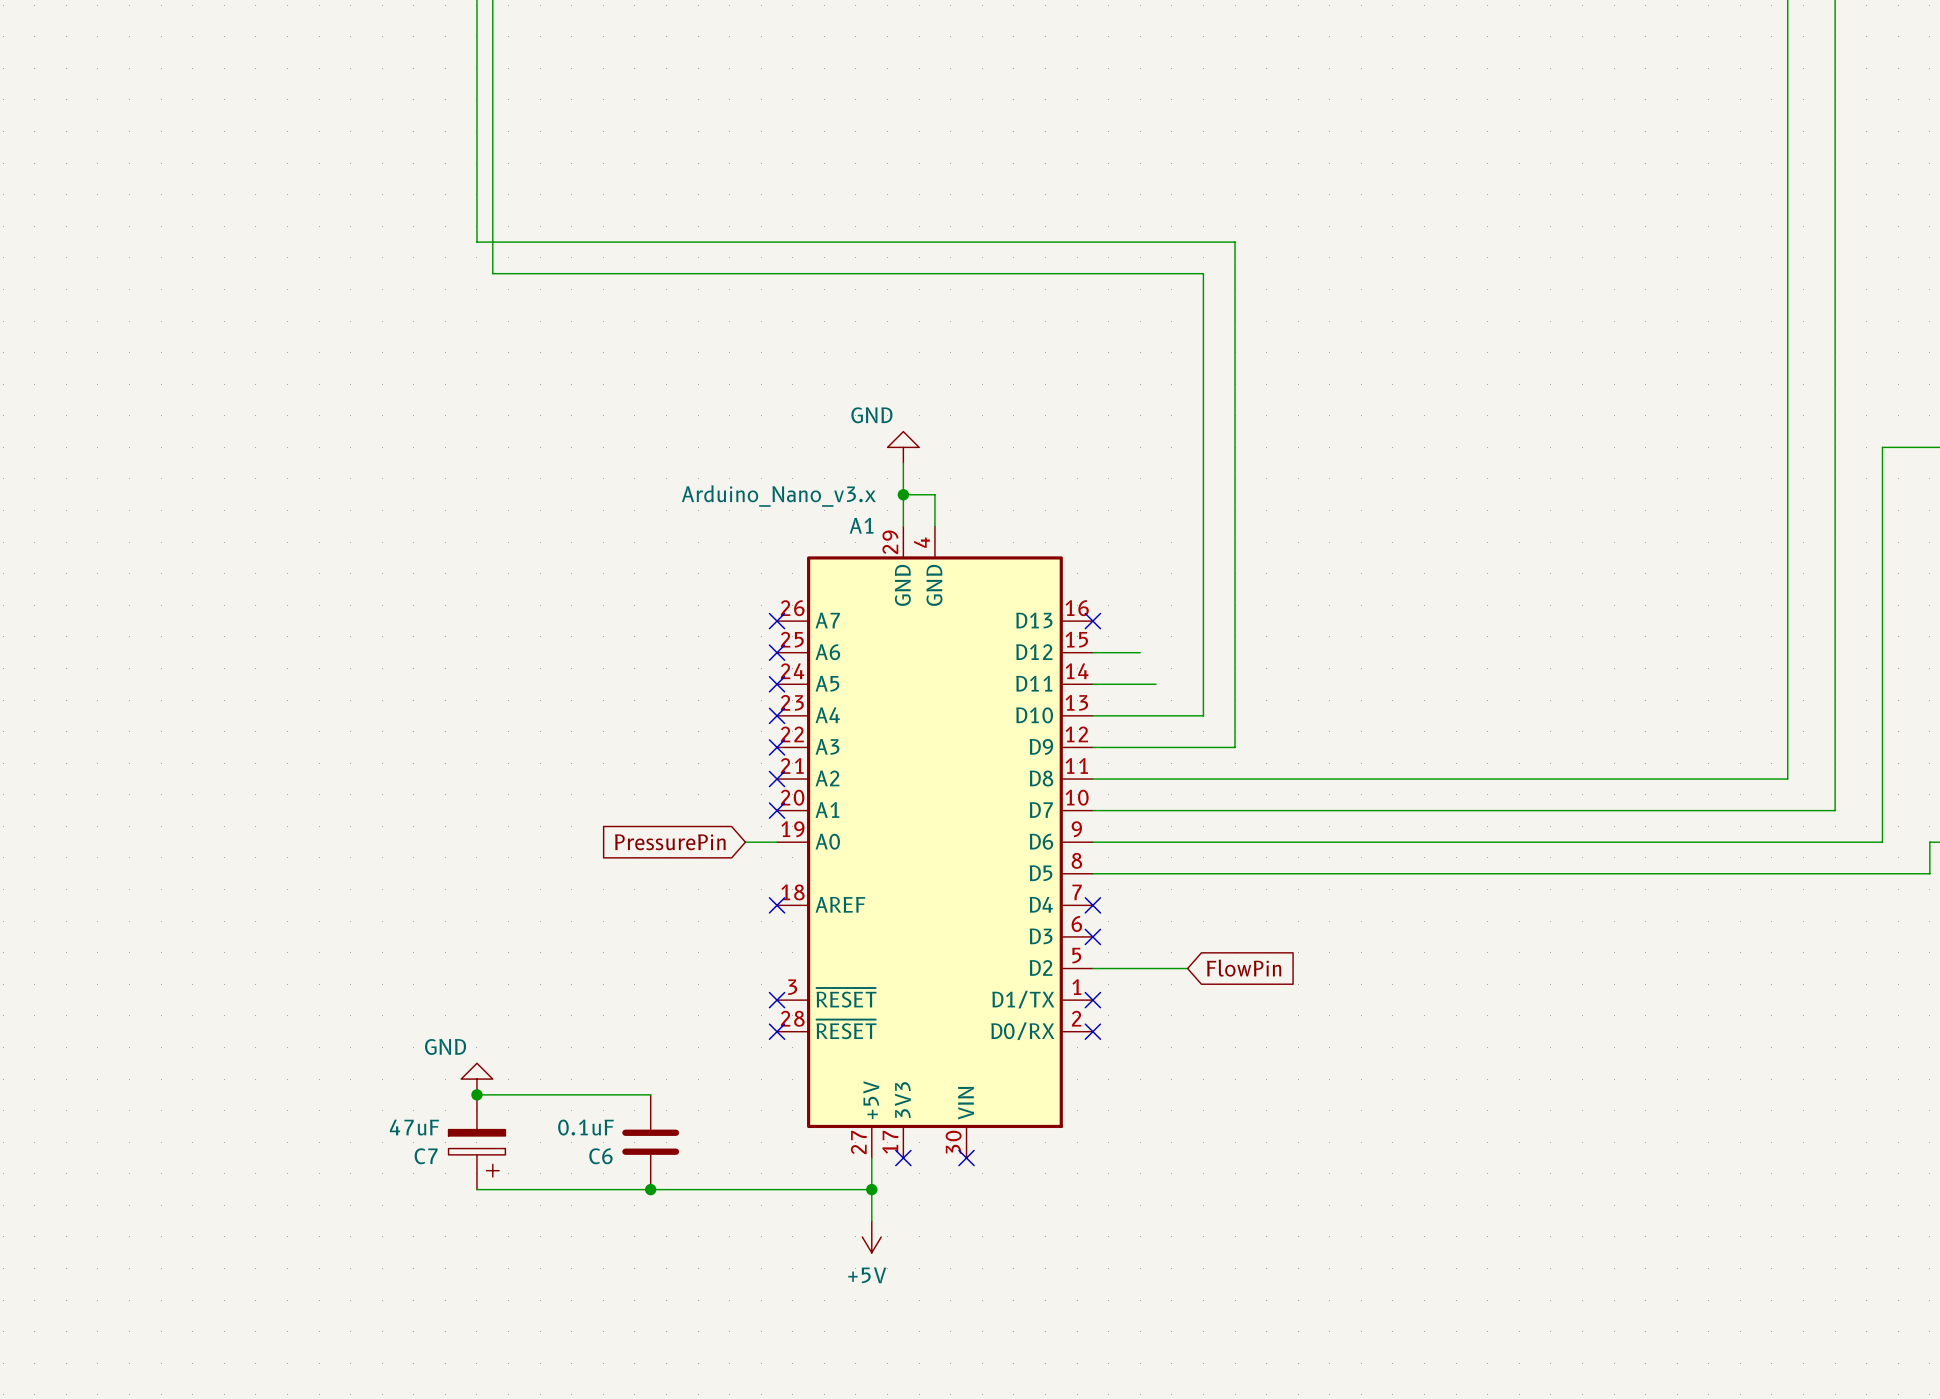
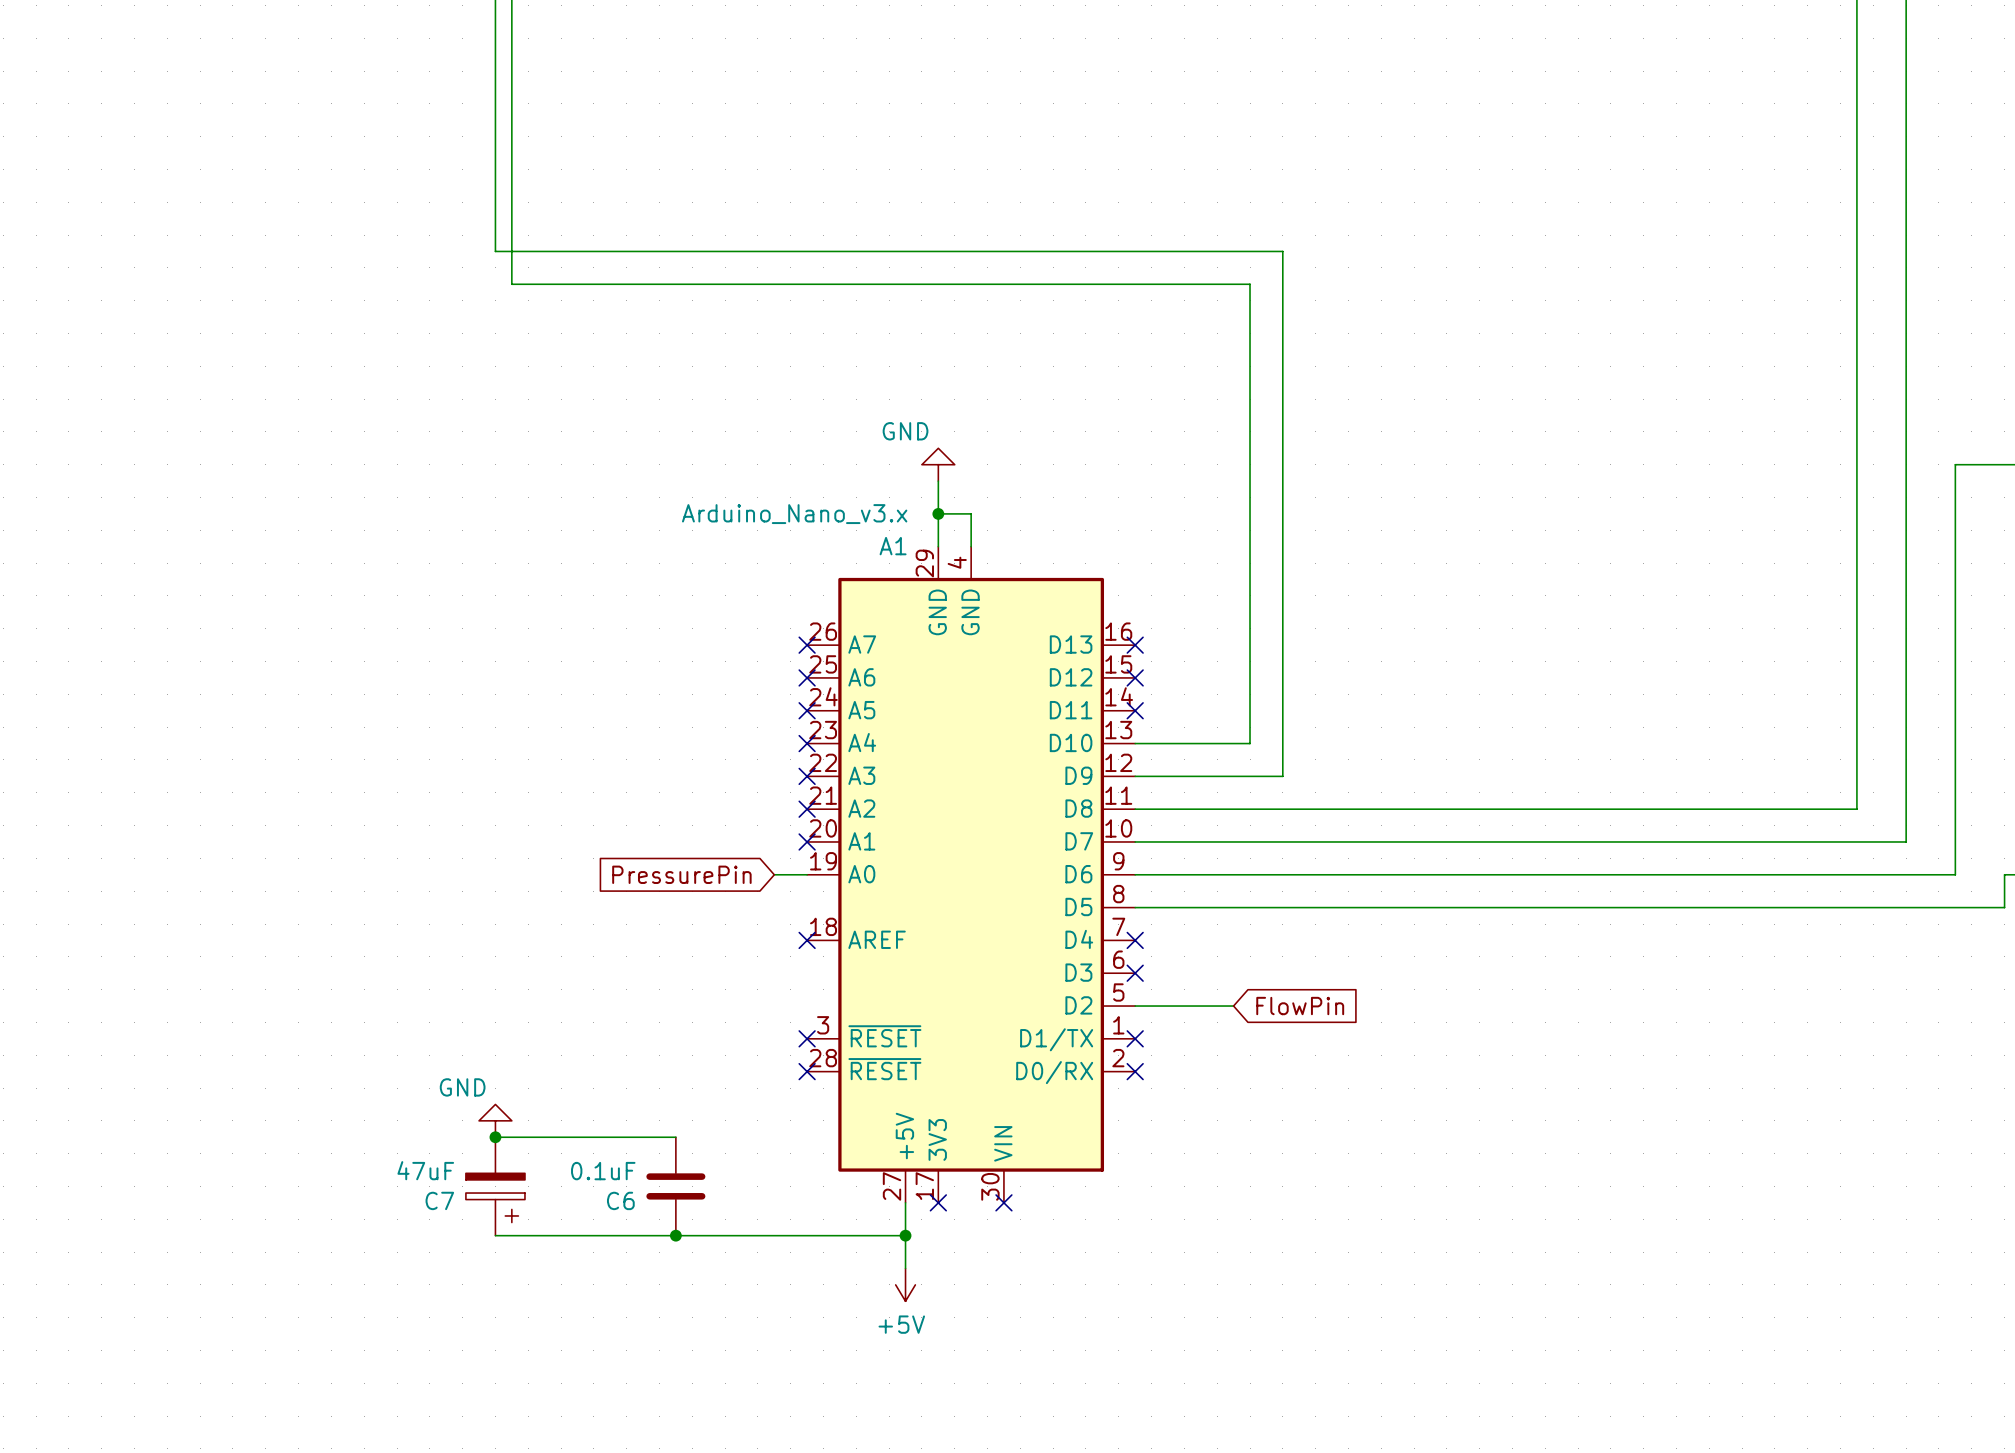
wire: (1092, 652) (1140, 652) -> none
no-connect mark: none -> (1135, 677)
wire: (1092, 684) (1156, 684) -> none
no-connect mark: none -> (1135, 710)

